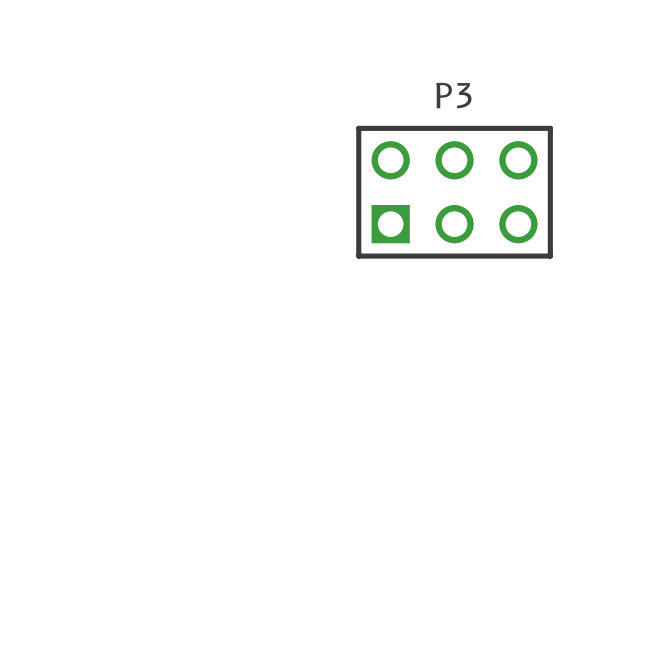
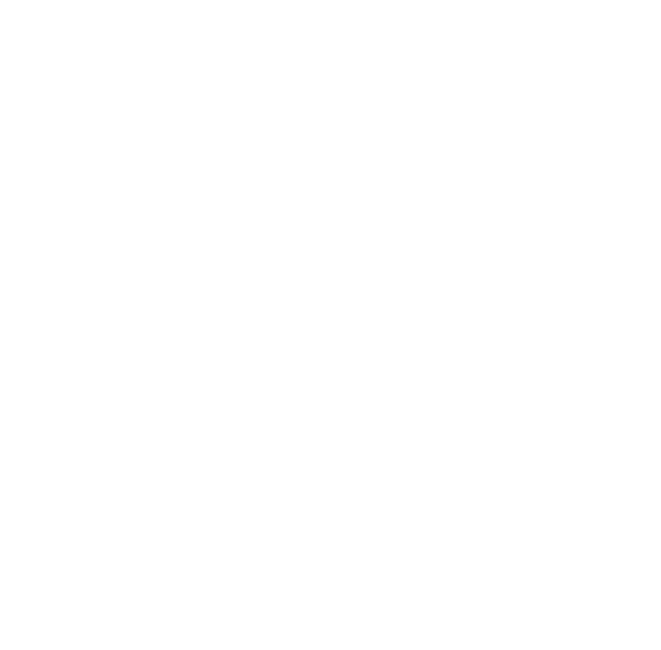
P3: (454, 192) -> none

